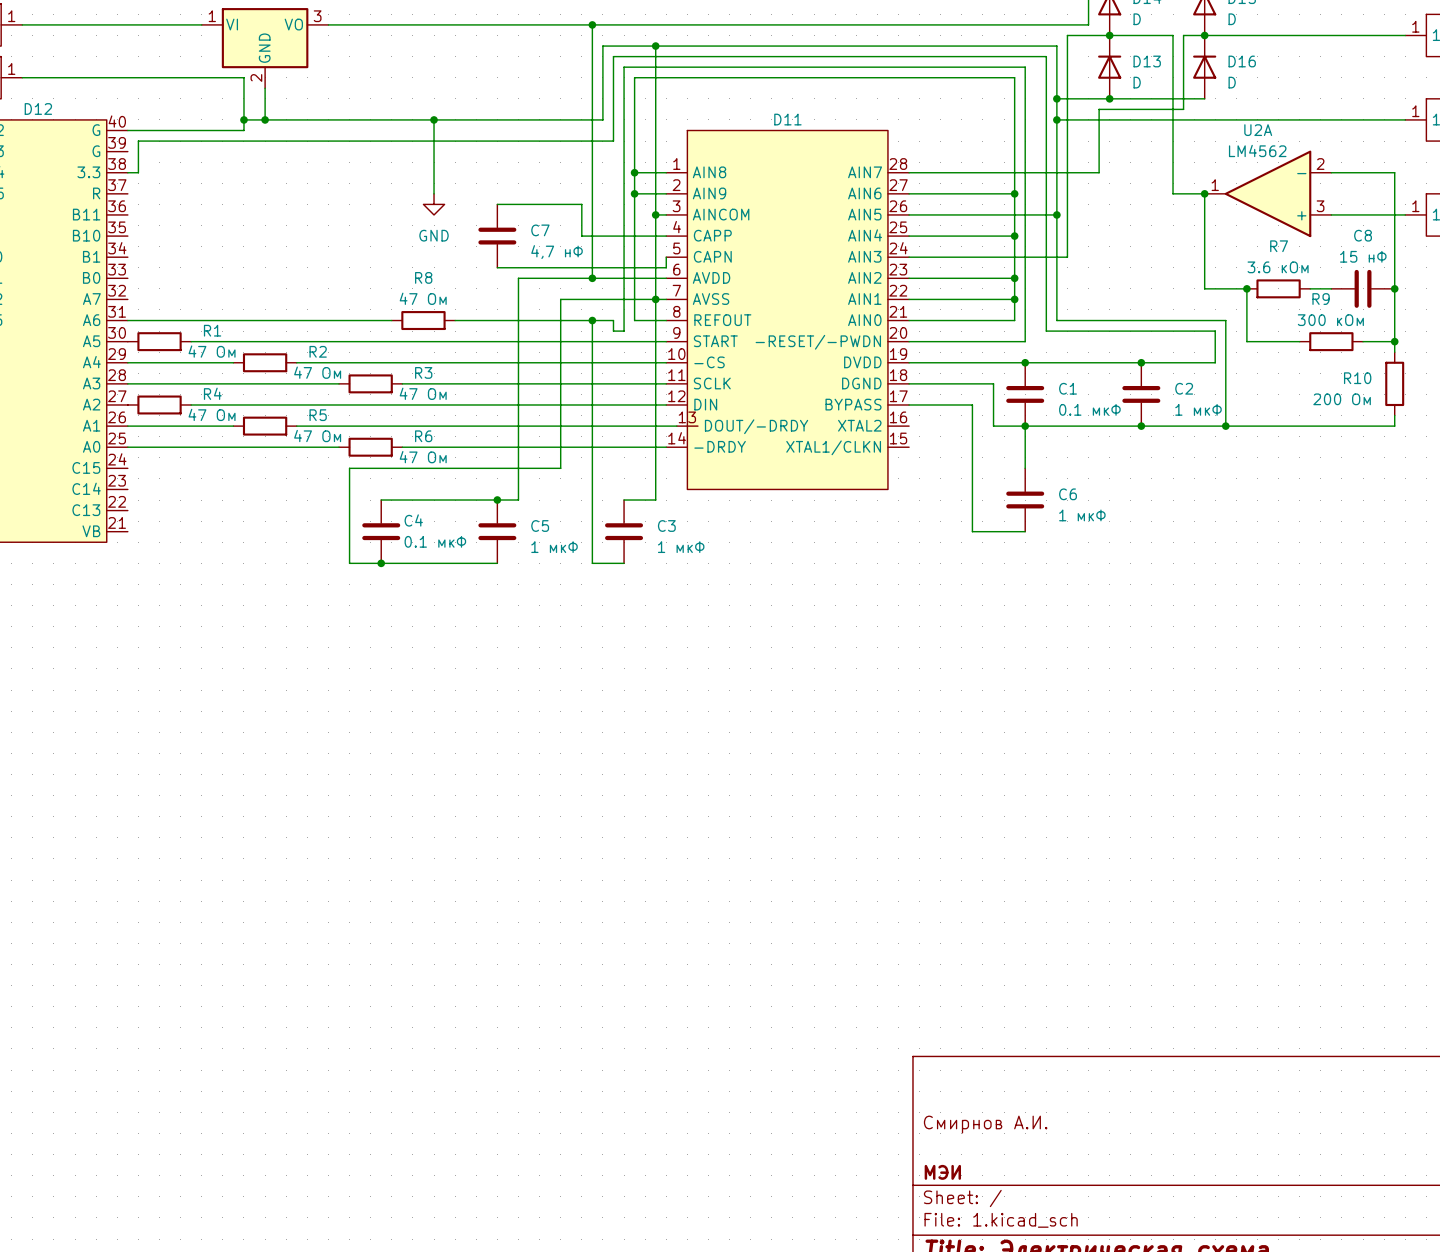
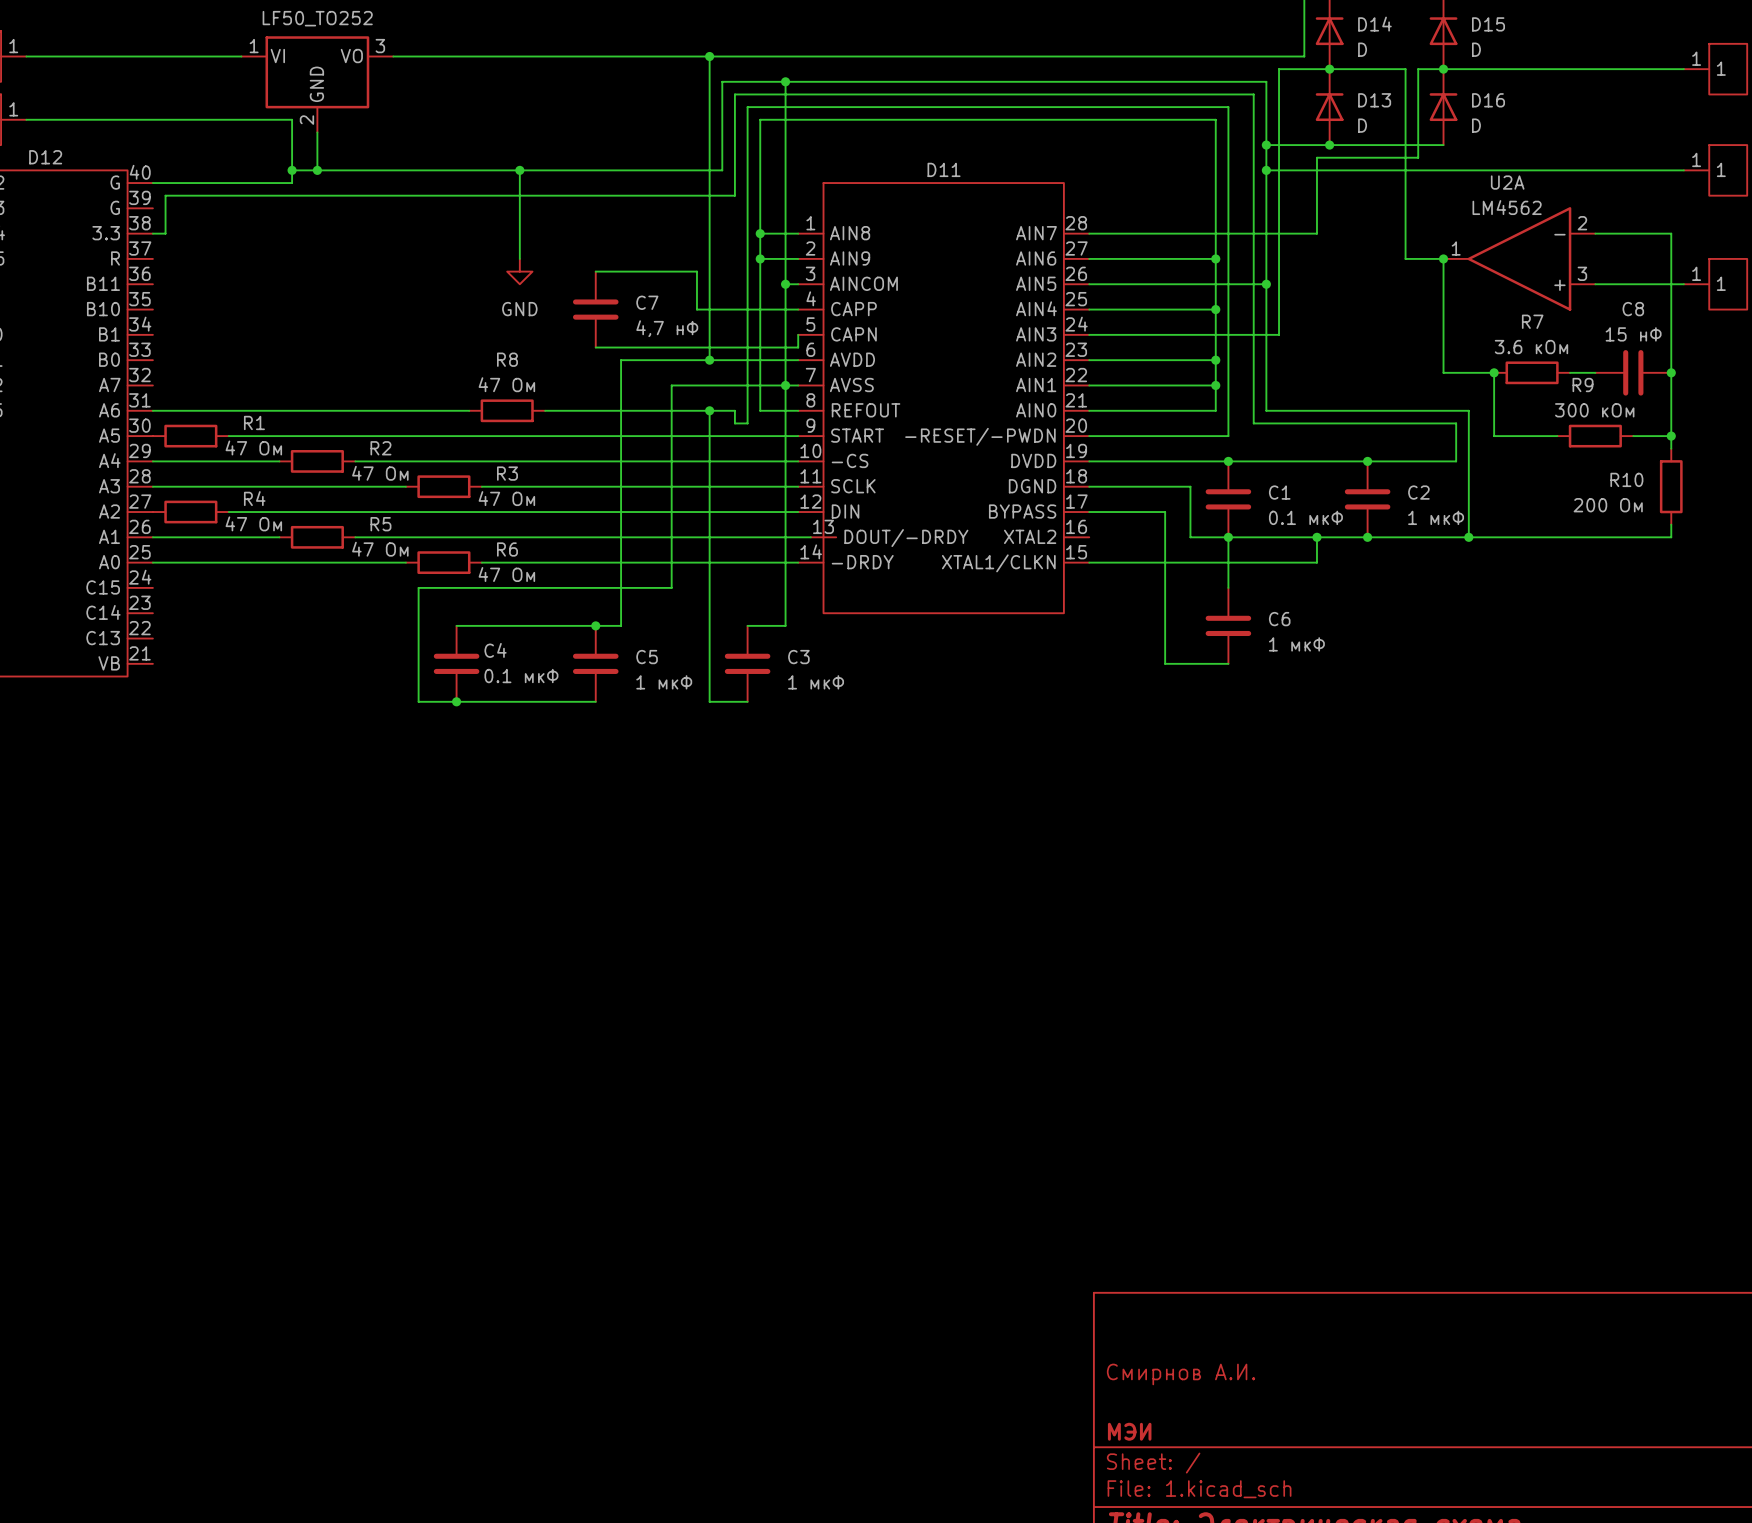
wire: none -> (1316, 537) (1316, 562) (1089, 562)
junction: none -> (1316, 537)

